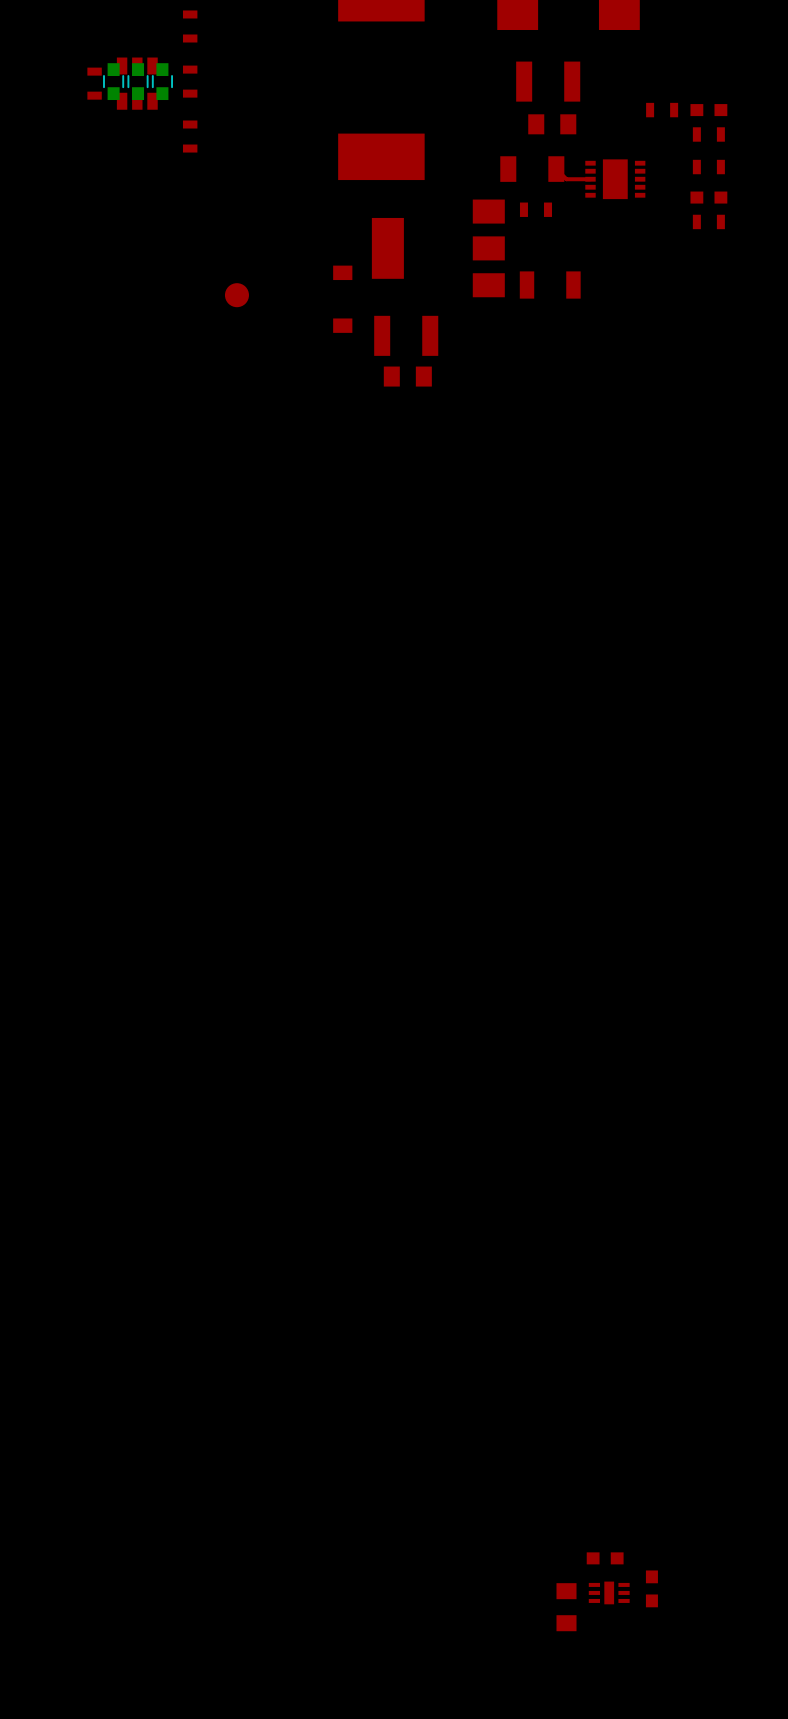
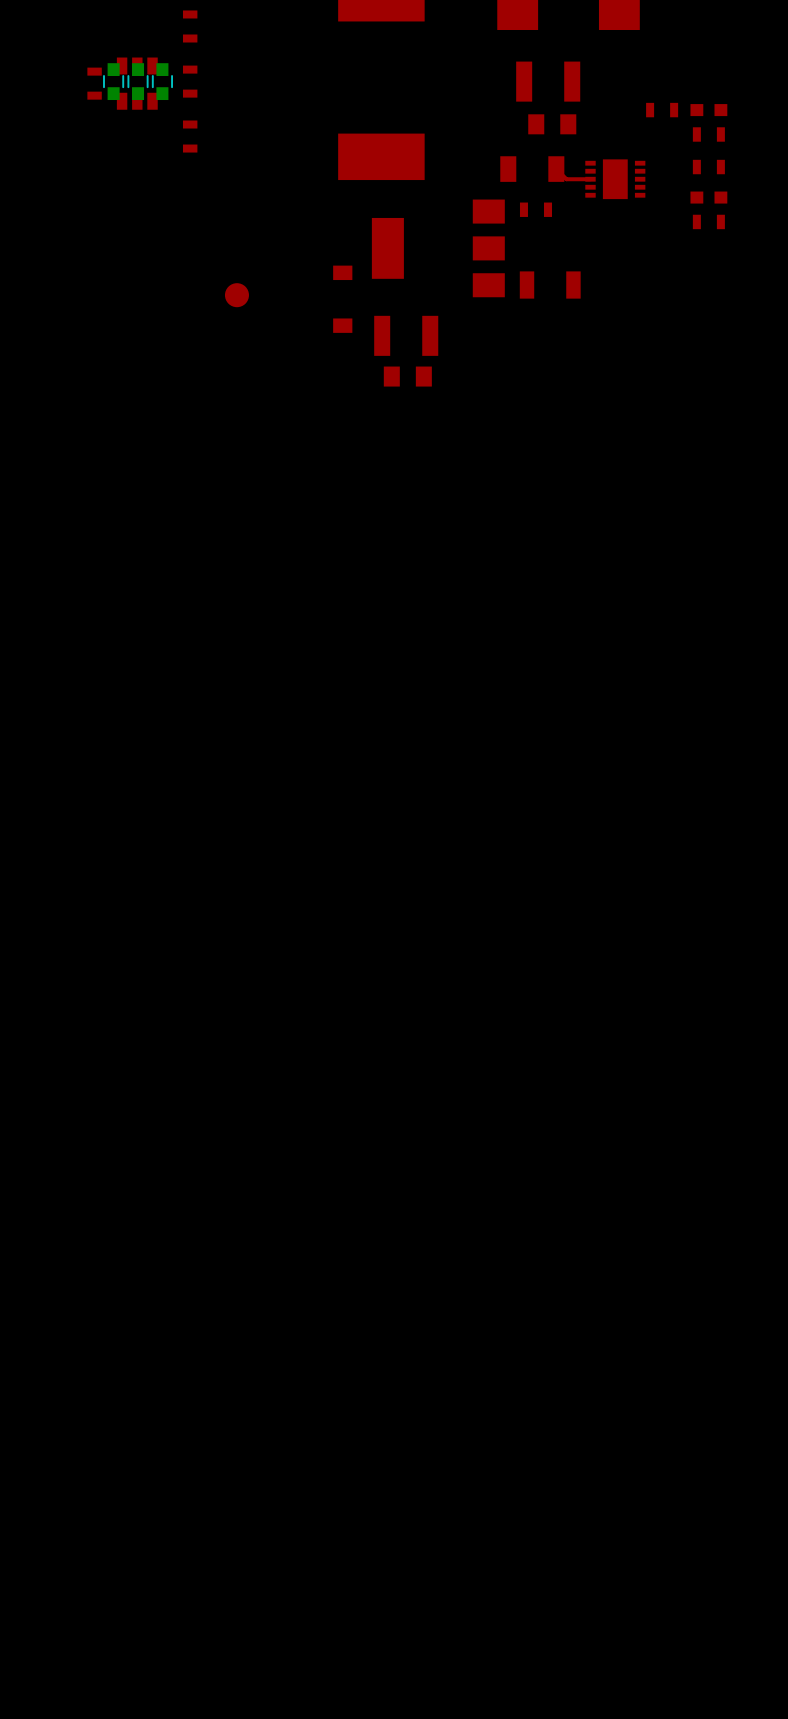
part: (605, 1558) -> none
part: (651, 1588) -> none
part: (609, 1592) -> none
part: (566, 1607) -> none

